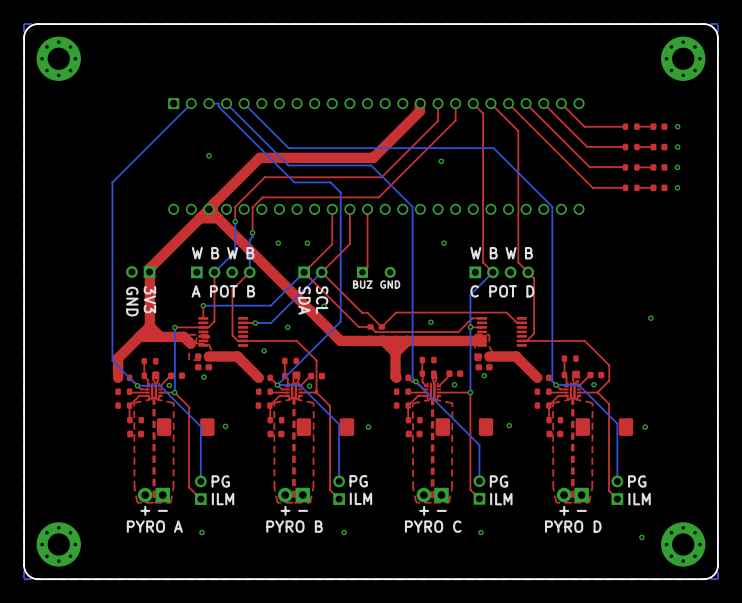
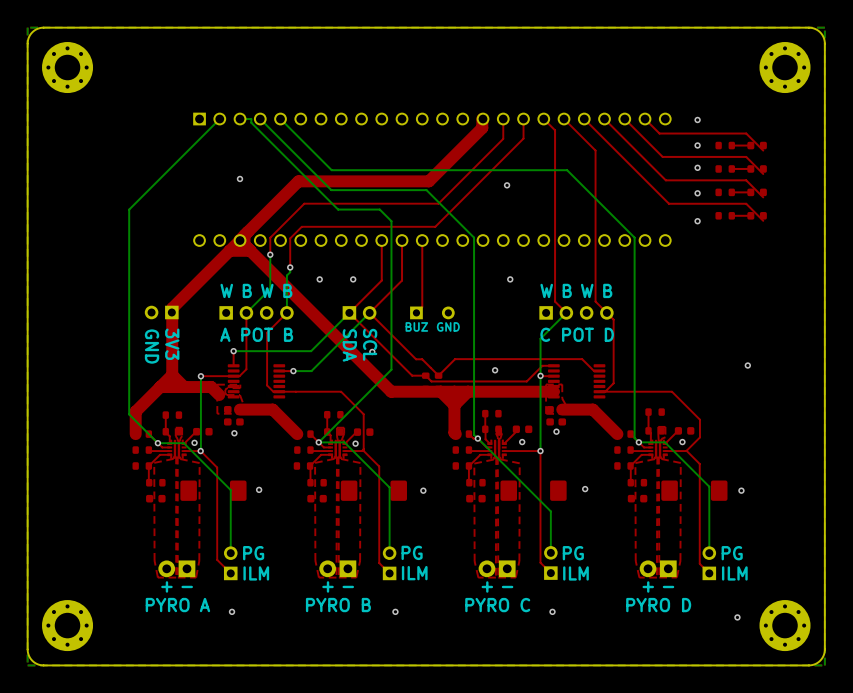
via: none -> (697, 119)
top track: (574, 116) (584, 126) (625, 126) -> (659, 133) (746, 133) (763, 150)
via: none -> (697, 145)
via: (677, 126) -> none
top track: (576, 136) (587, 146) (625, 147) -> (662, 156) (746, 156) (763, 173)
via: none -> (697, 167)
via: (677, 147) -> none
top track: (579, 156) (589, 167) (625, 167) -> (665, 180) (746, 180) (763, 197)
via: (677, 167) -> none
via: none -> (697, 193)
top track: (582, 177) (592, 187) (625, 187) -> (669, 203) (746, 203) (763, 220)
via: (677, 187) -> none
via: none -> (697, 221)
via: (287, 327) -> none
via: (264, 350) -> none

